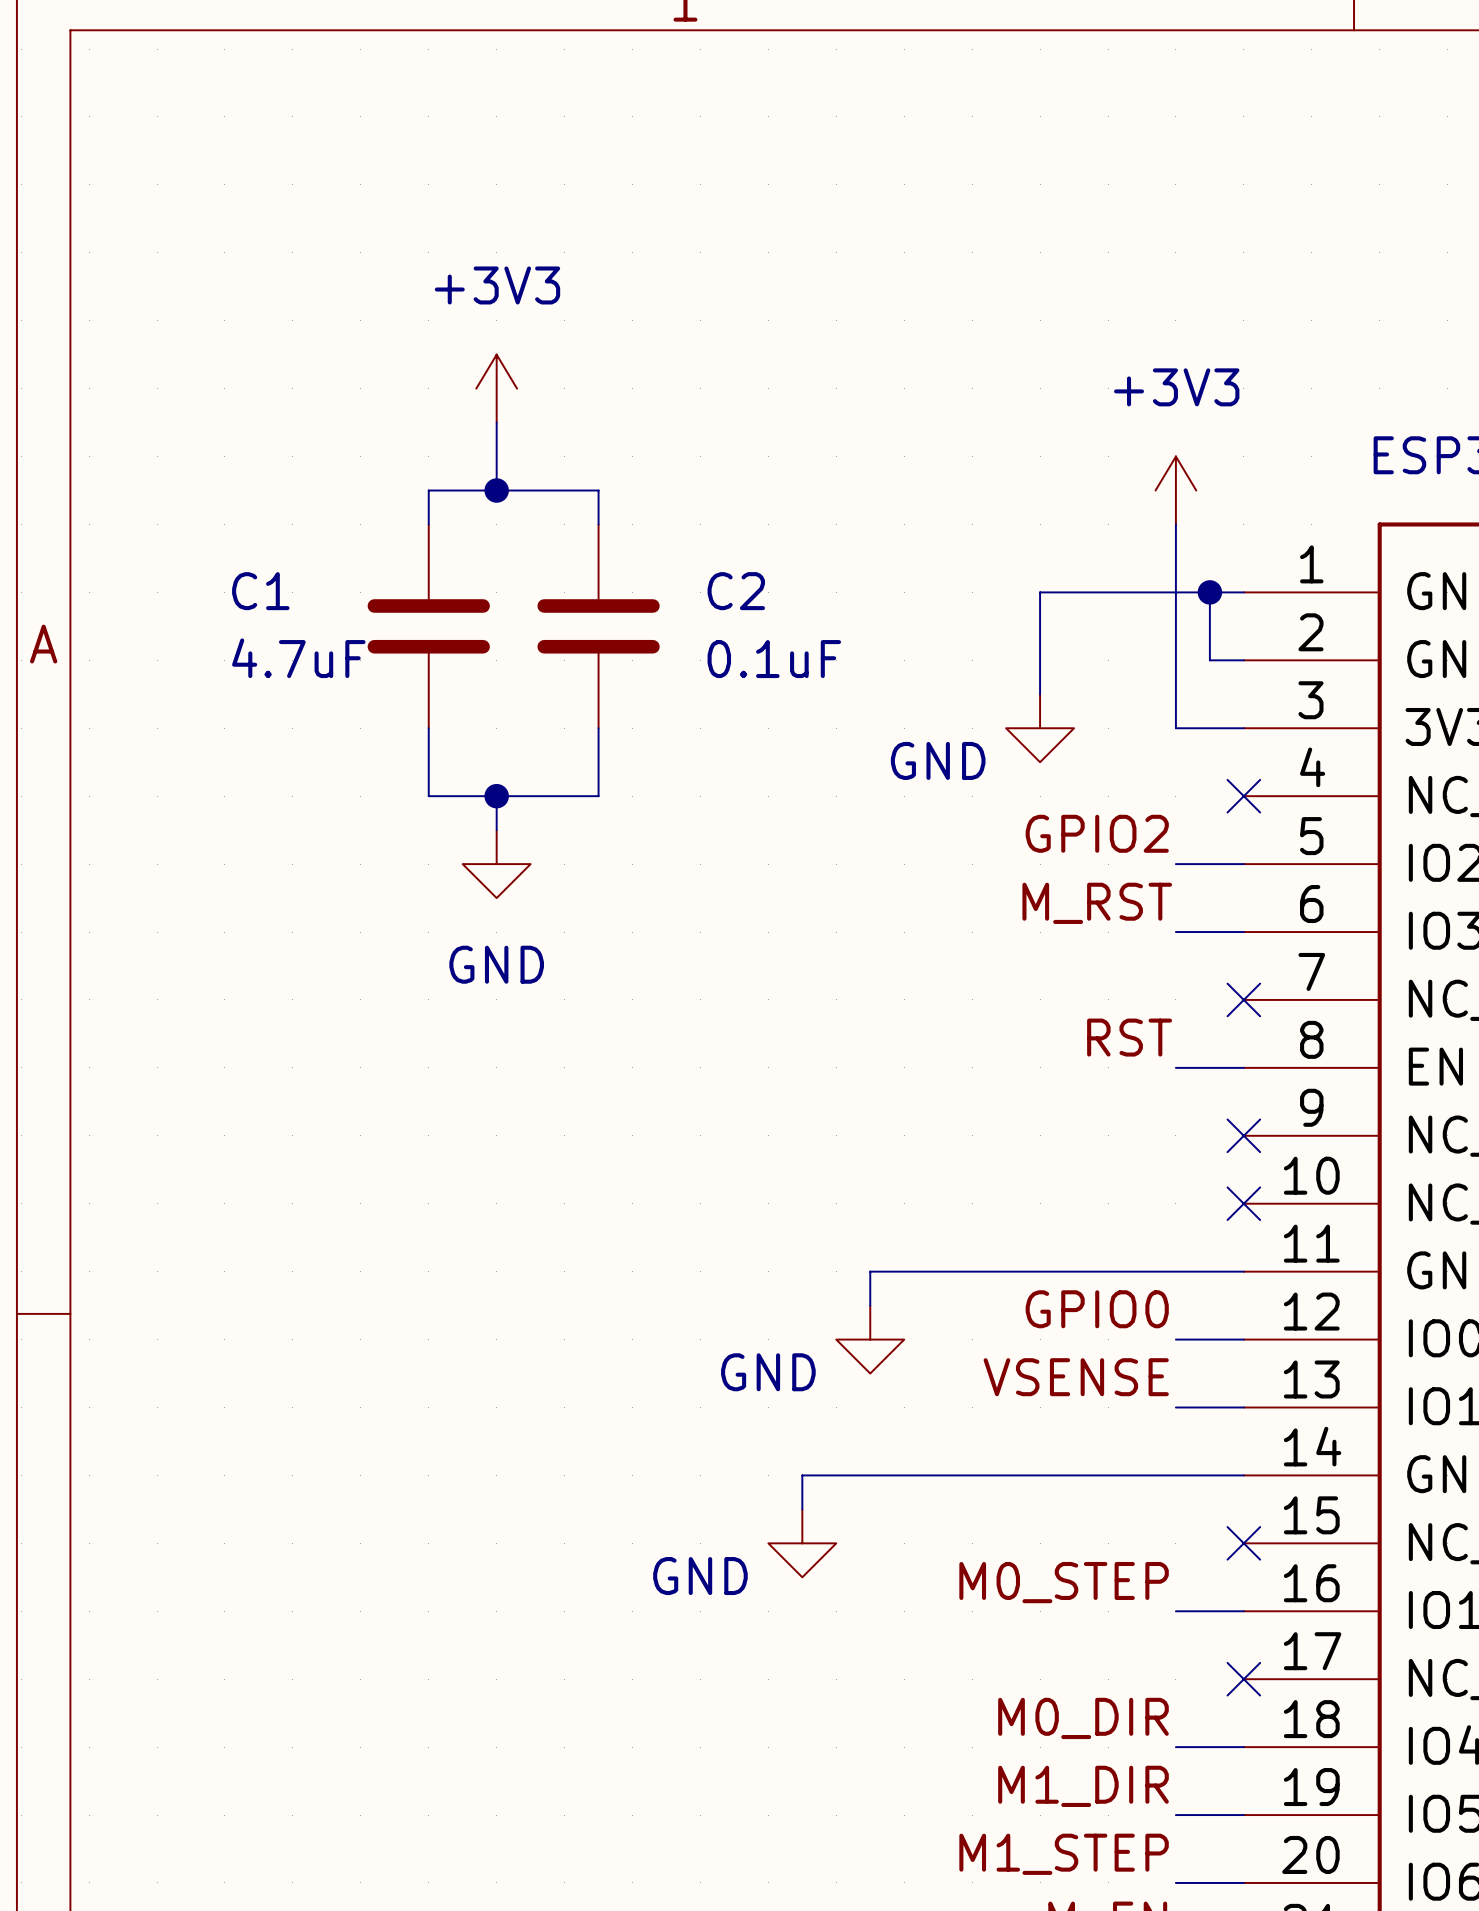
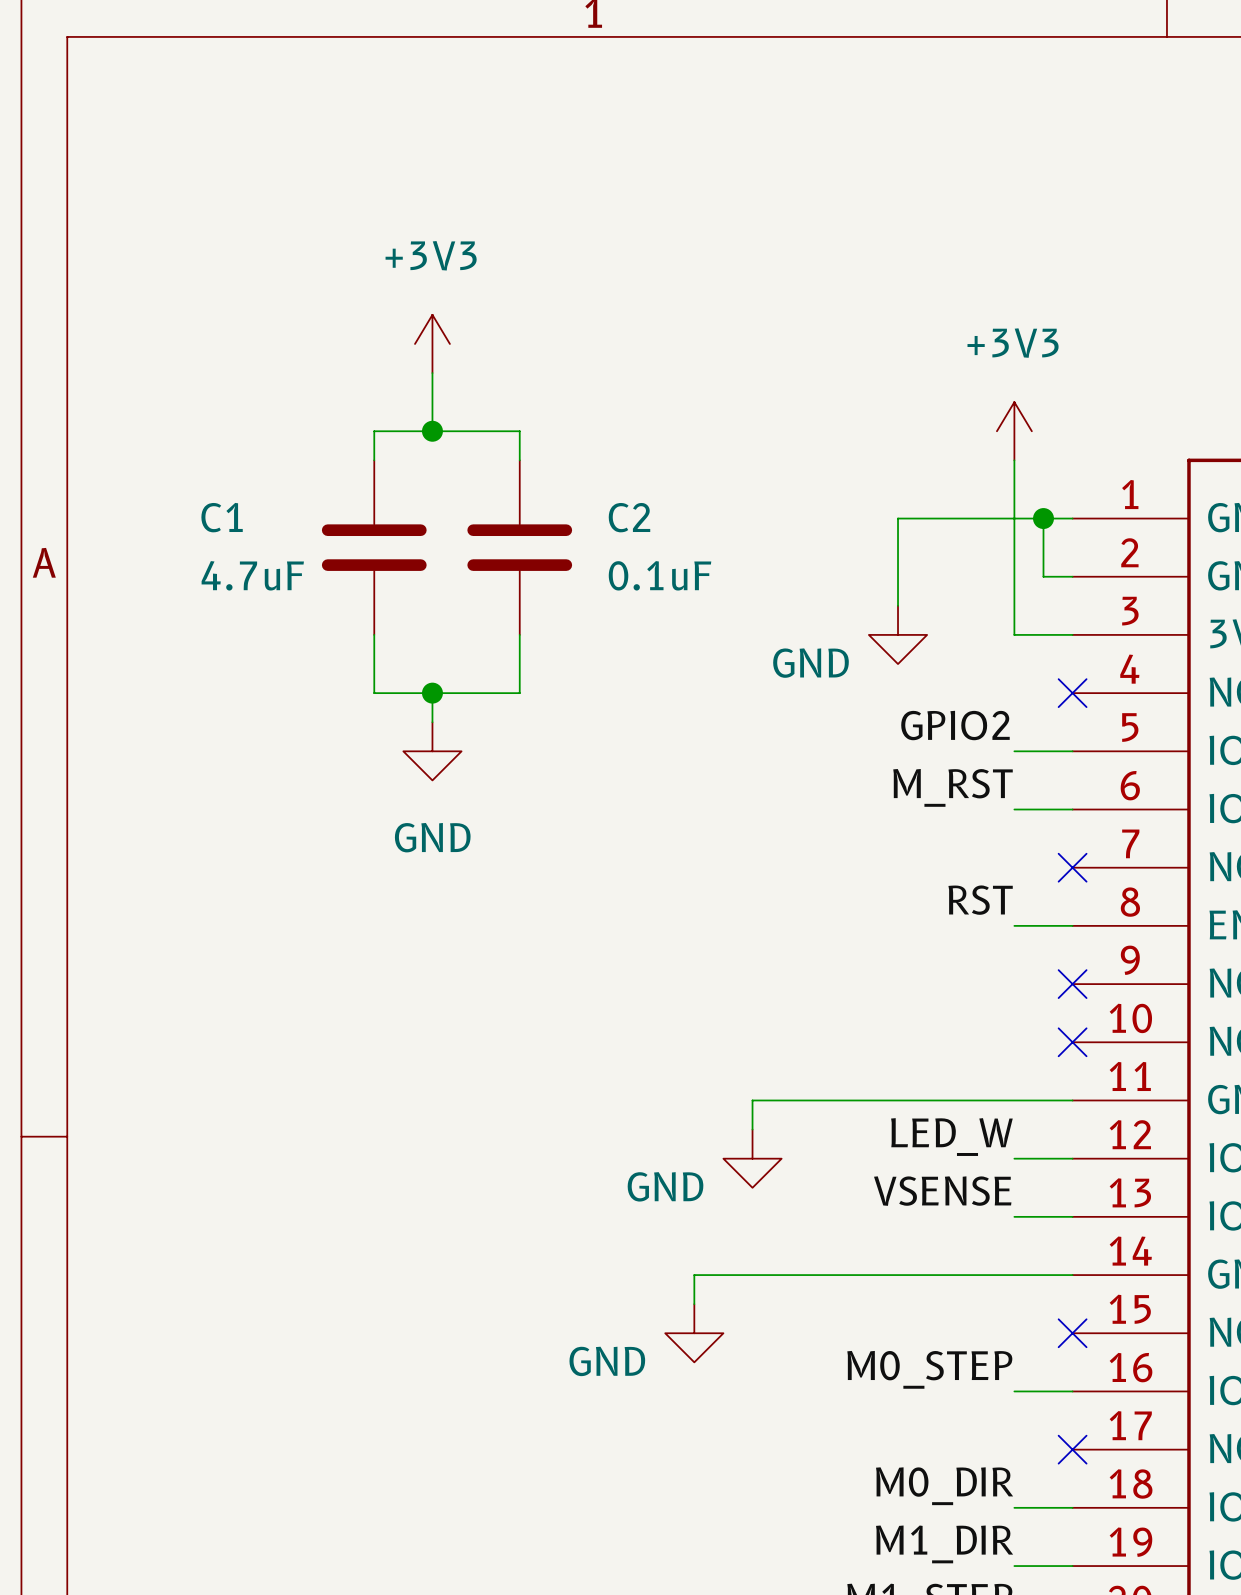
label: GPIO0 (1097, 1309) -> LED_W (951, 1137)

